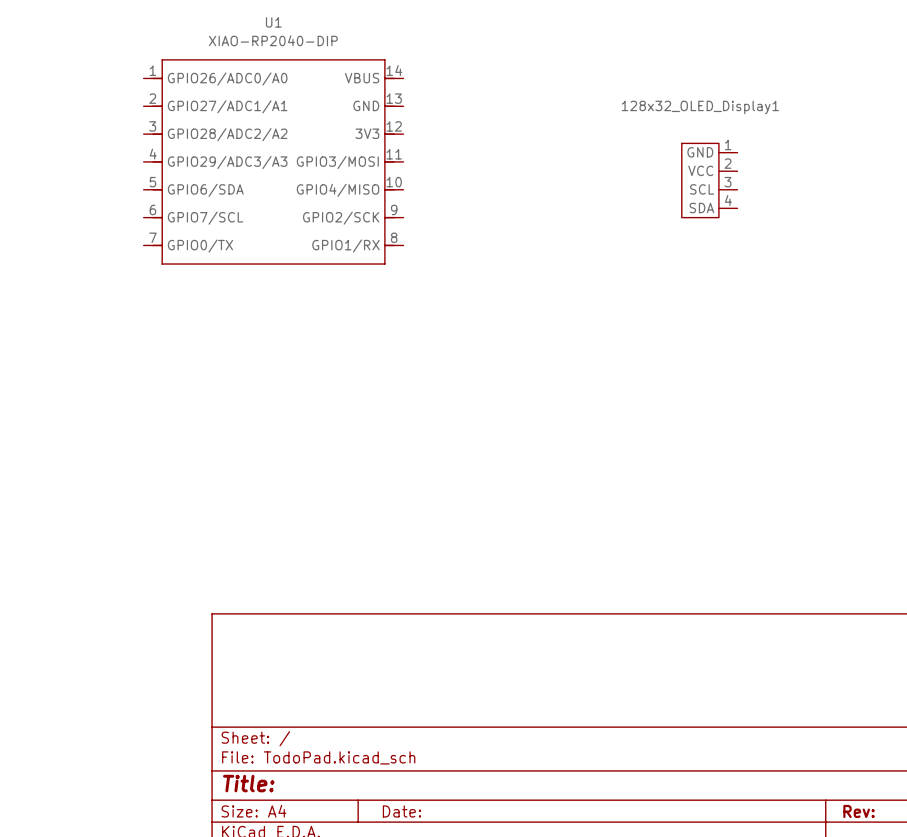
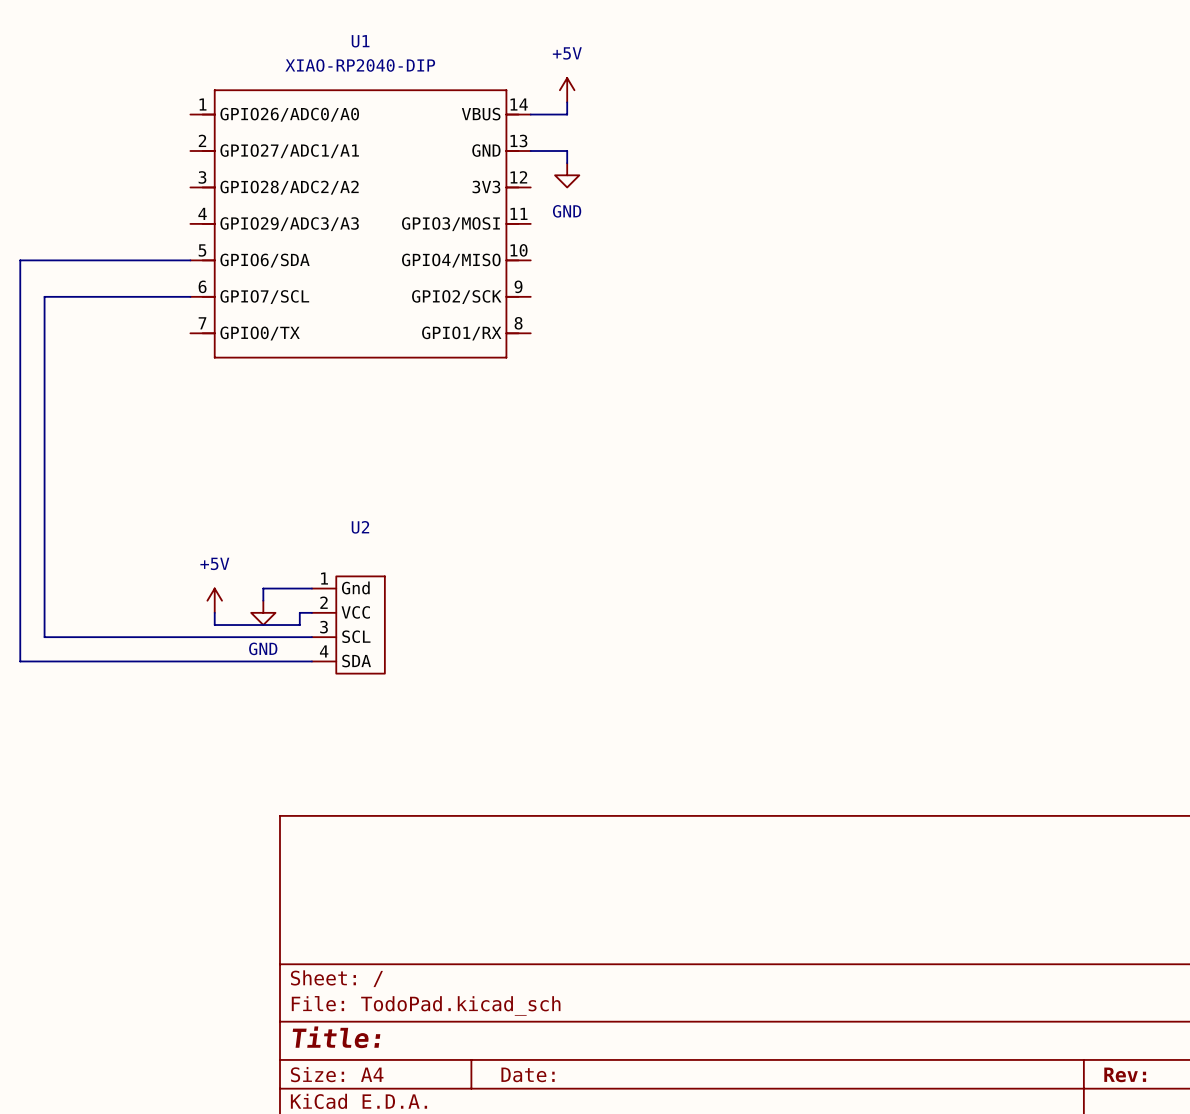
power symbol: none -> +5V (567, 90)
wire: none -> (567, 102) (567, 114) (530, 114)
wire: none -> (530, 151) (567, 151) (567, 163)
power symbol: none -> GND (567, 175)
128x32_OLED_Display1: (709, 180) -> none
wire: none -> (190, 260) (20, 260) (20, 661) (311, 661)
wire: none -> (190, 296) (44, 296) (44, 637) (311, 637)
wire: none -> (311, 588) (263, 588) (263, 600)
power symbol: none -> +5V (214, 600)
wire: none -> (214, 612) (214, 625) (299, 625) (299, 612) (311, 612)
power symbol: none -> GND (263, 612)
U2: none -> (348, 625)

